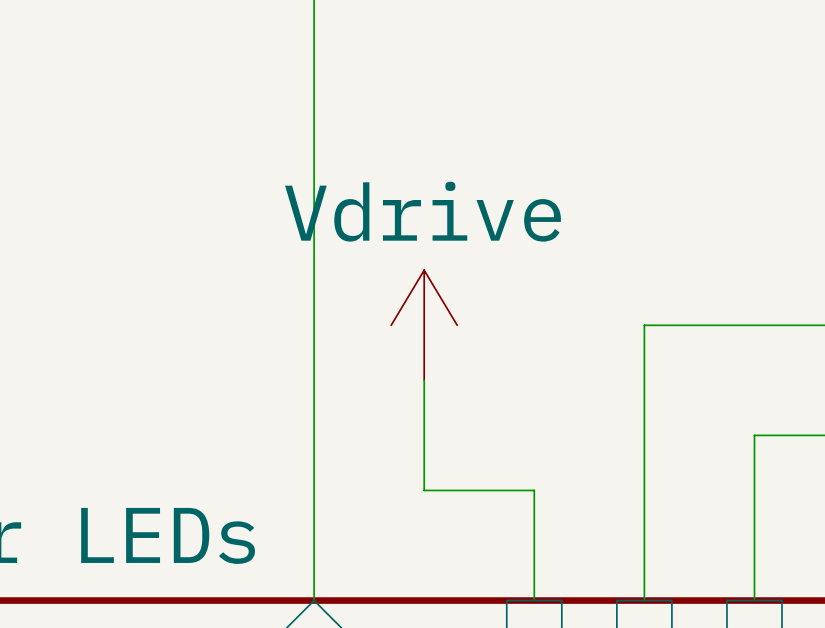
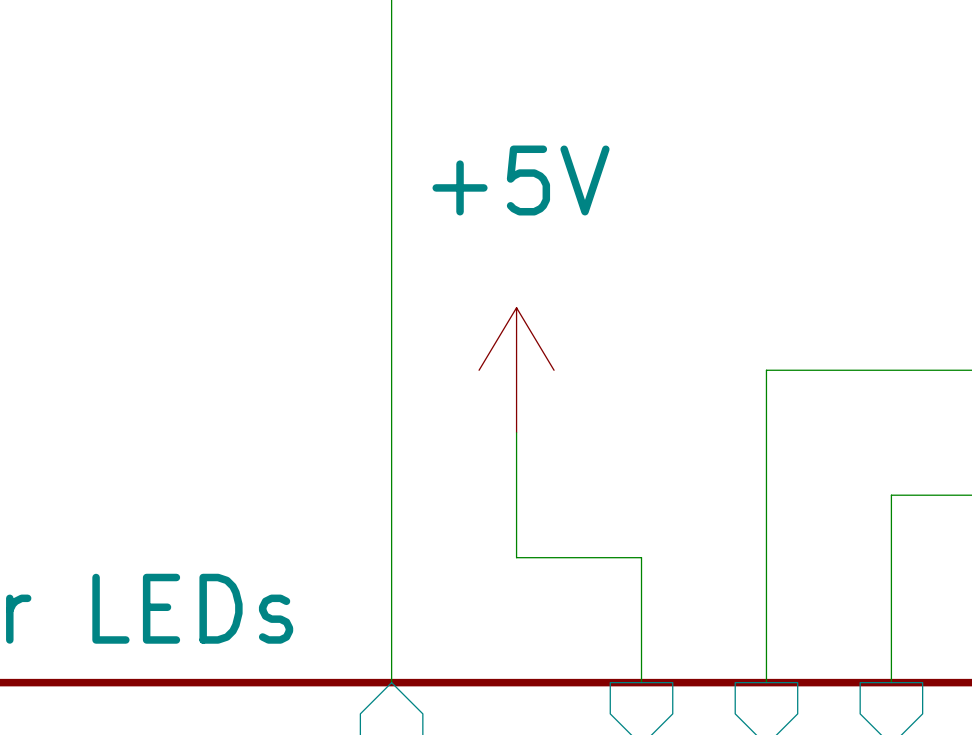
power symbol: Vdrive (424, 325) -> +5V (516, 370)

